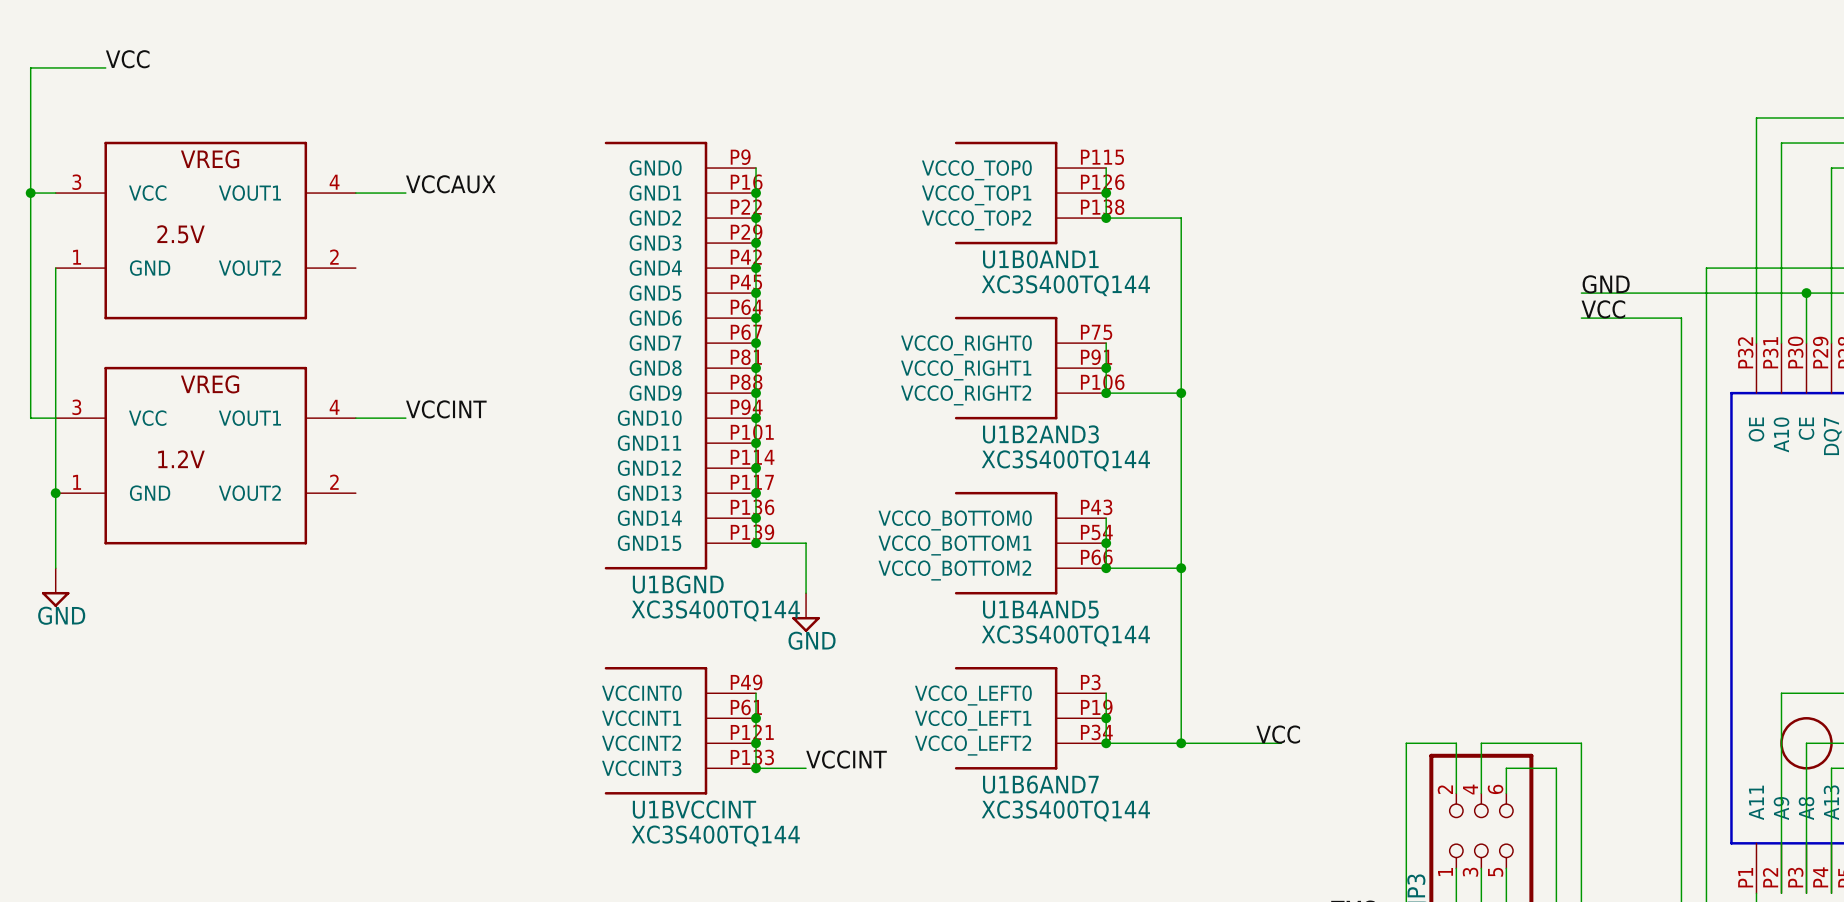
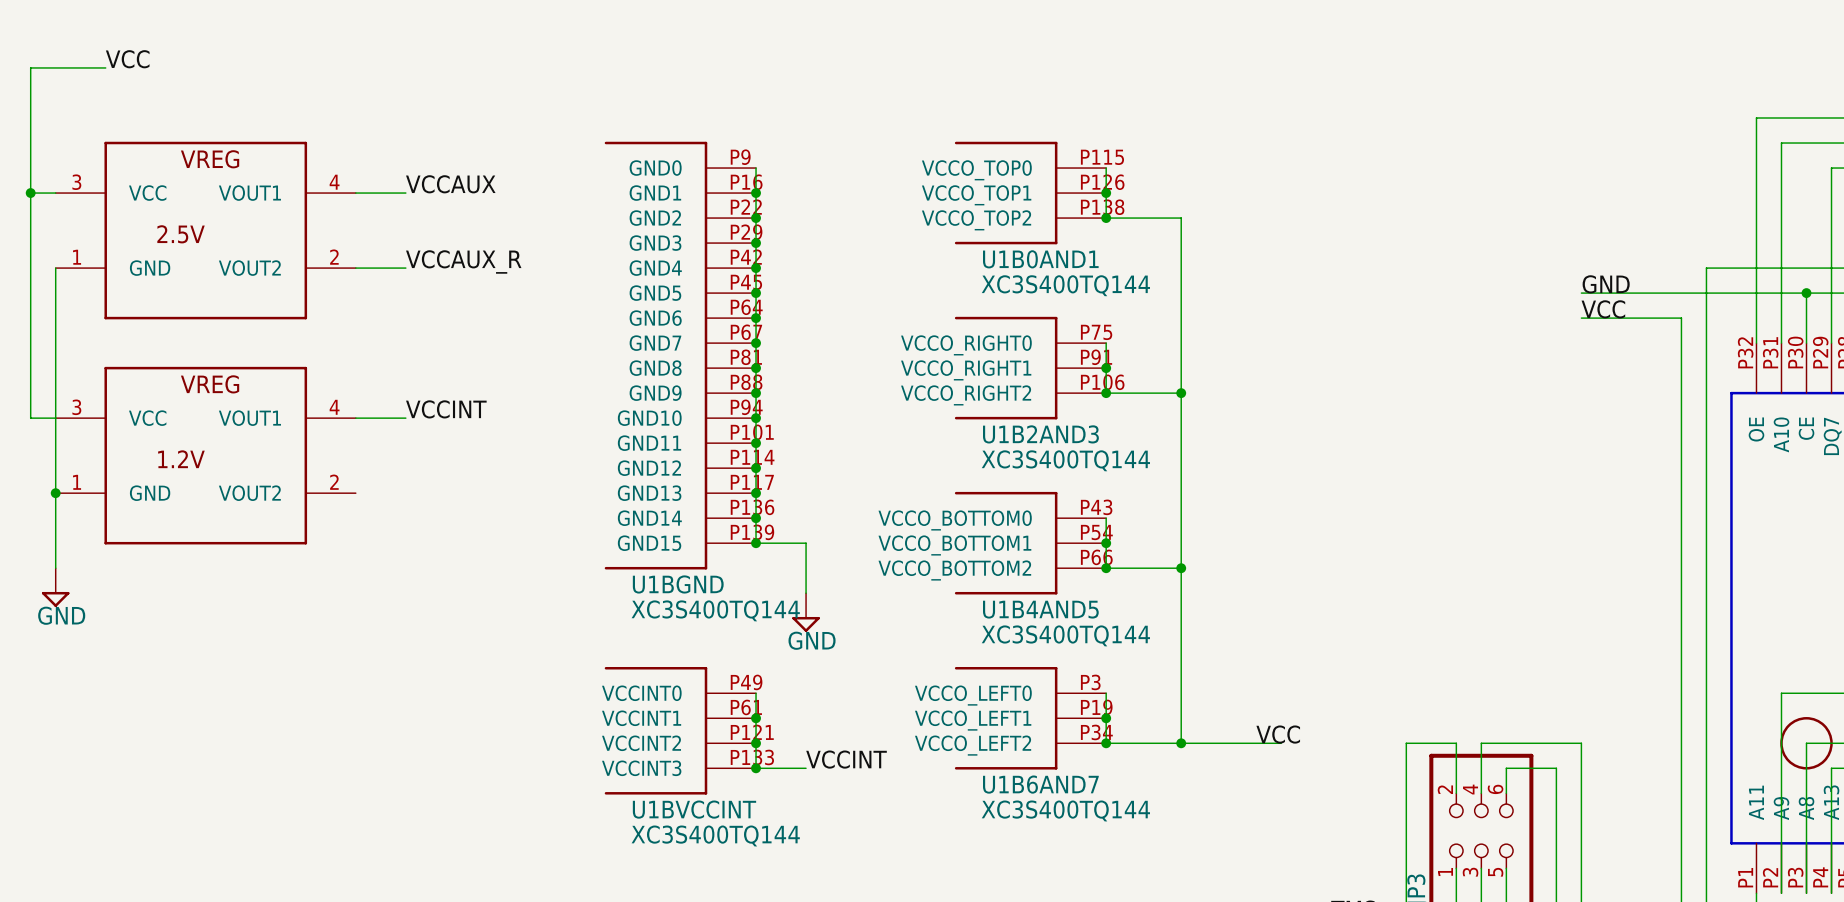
label: none -> VCCAUX_R (463, 261)
wire: none -> (355, 268) (405, 268)

